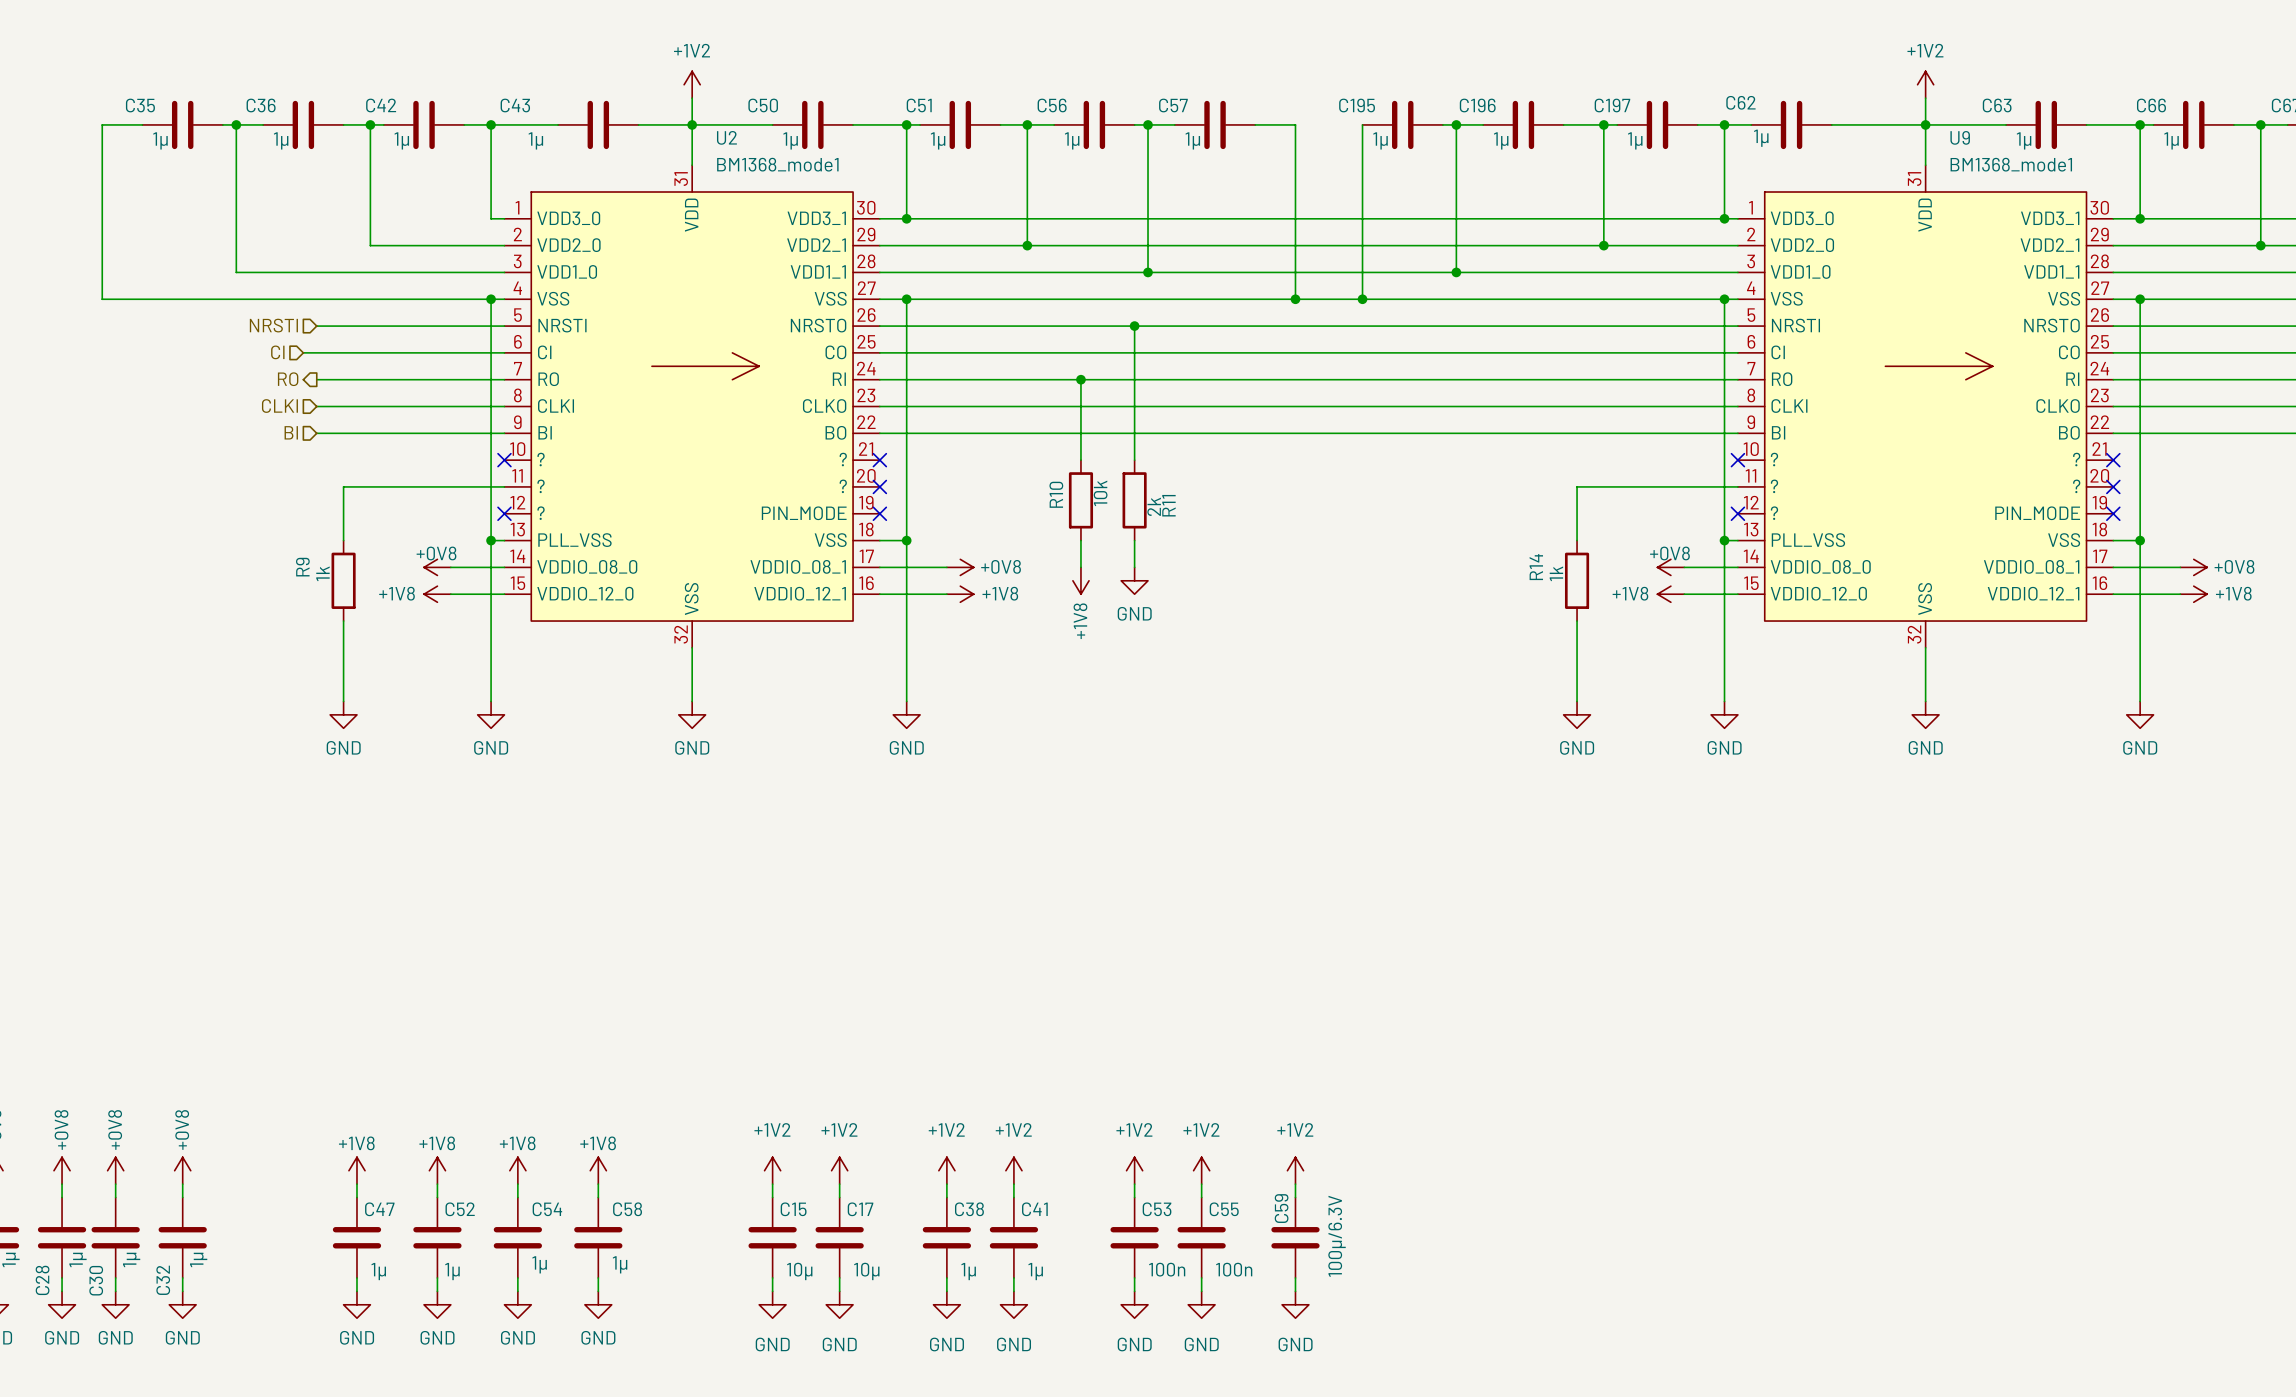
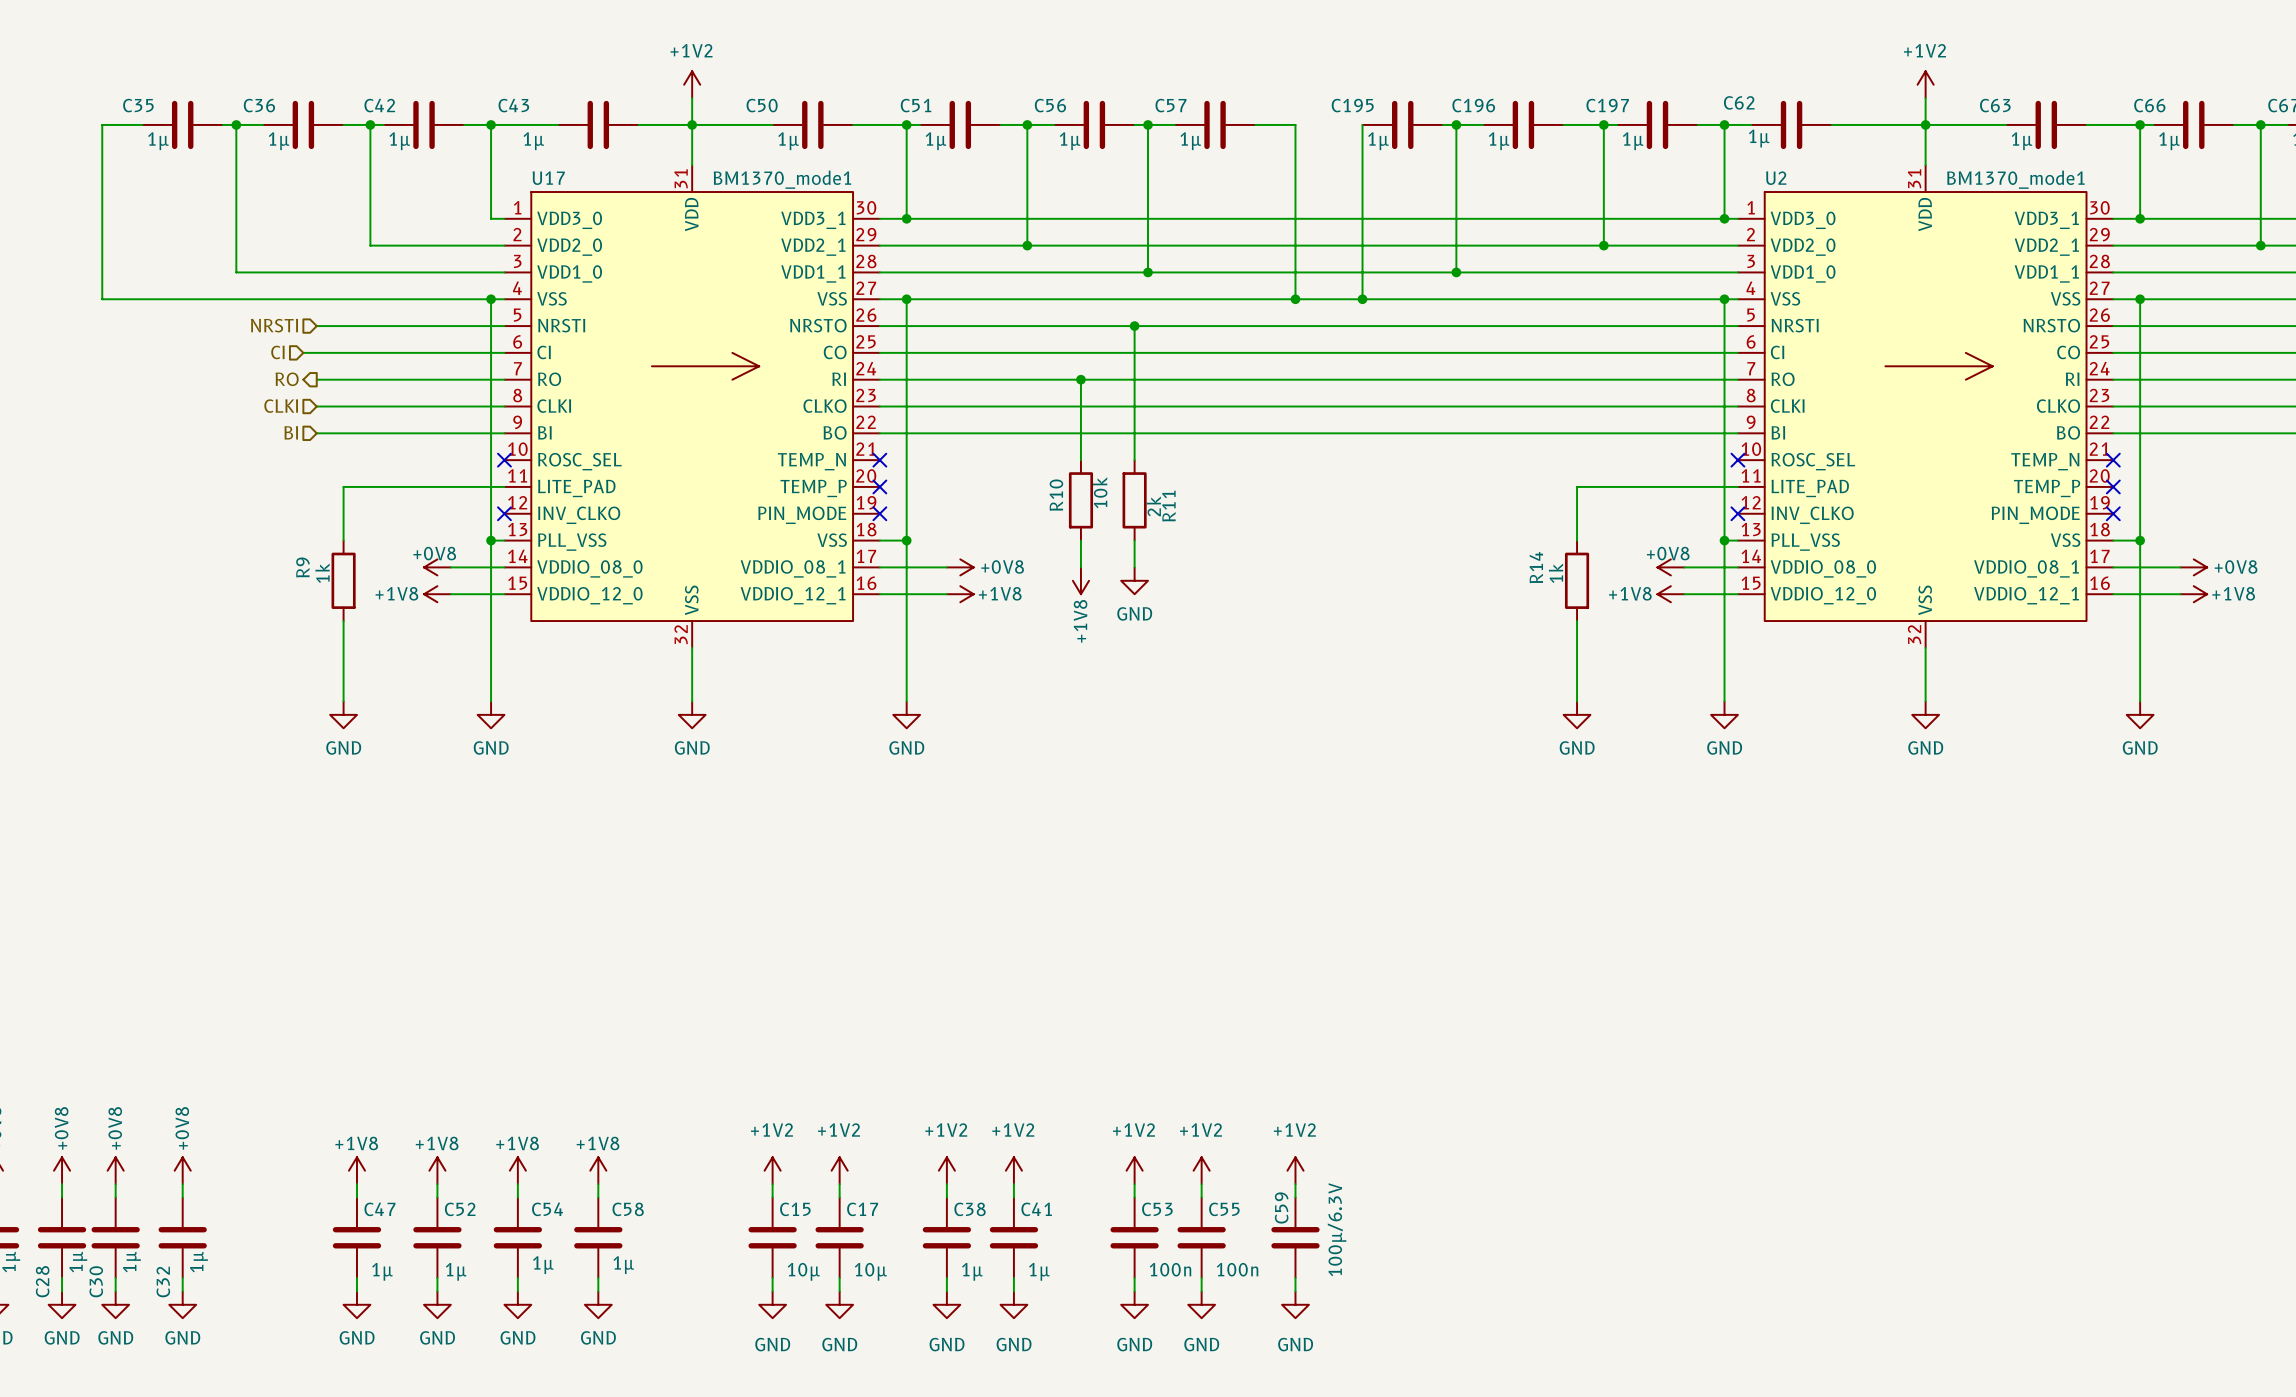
U2 name position: U2 (726, 137) -> U2 (1776, 178)
U2 value: BM1368_mode1 (777, 164) -> BM1370_mode1 (2015, 179)
U2 position: (692, 406) -> (1925, 406)
U17: none -> BM1370_mode1 (692, 406)
U9: BM1368_mode1 (1925, 406) -> none
U2 pin name: ? (541, 459) -> ROSC_SEL (1813, 461)
U2 pin name: ? (843, 459) -> TEMP_N (2045, 461)
U2 pin name: ? (541, 486) -> LITE_PAD (1810, 488)
U2 pin name: ? (843, 486) -> TEMP_P (2047, 488)
U2 pin name: ? (541, 513) -> INV_CLKO (1812, 515)

